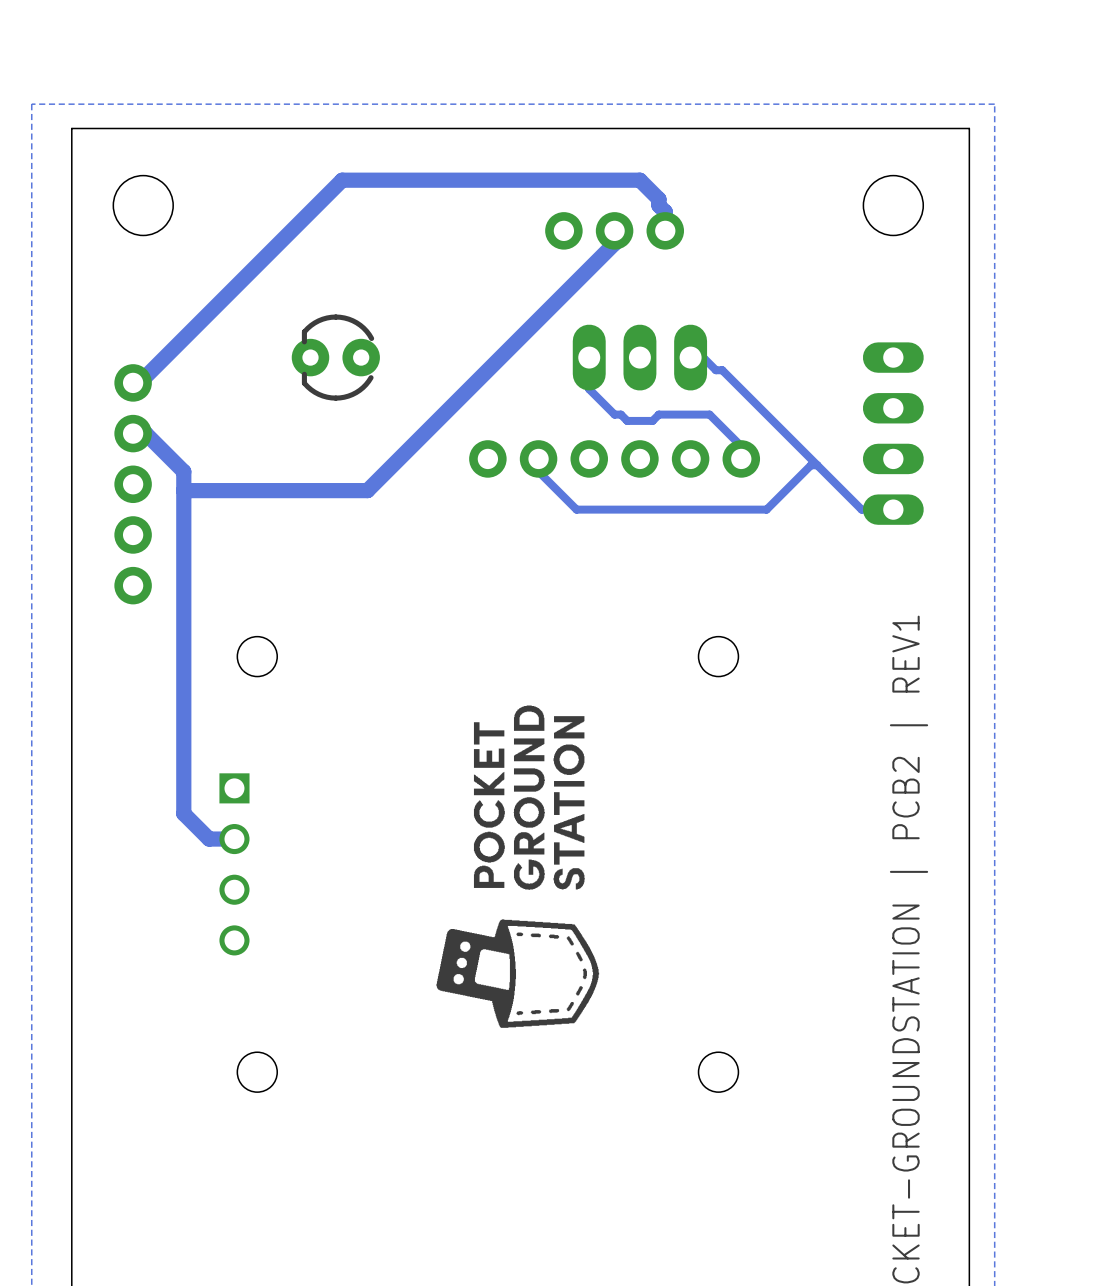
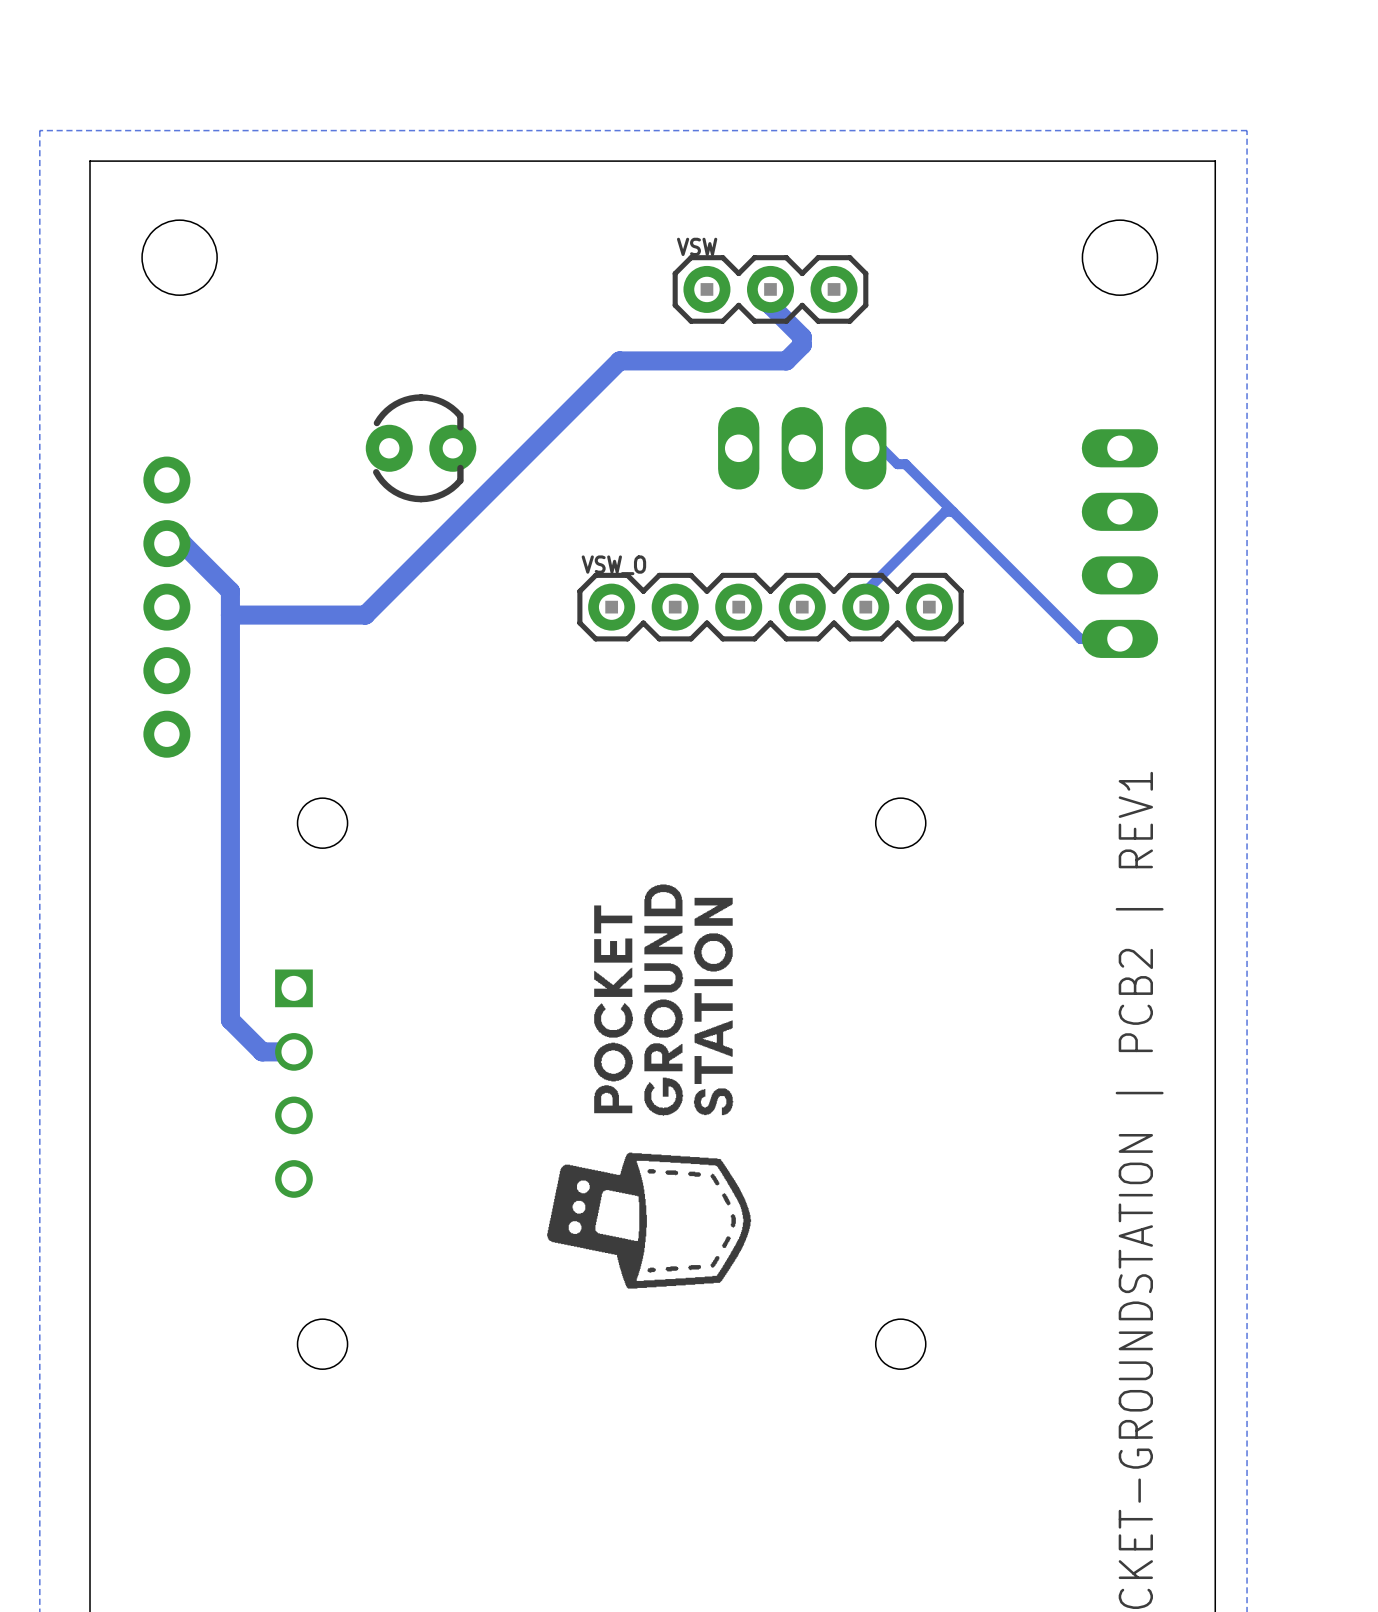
VSW side: top (614, 230) -> bottom (770, 289)
track: (665, 230) (665, 211) (658, 205) (658, 199) (639, 180) (342, 180) (139, 382) (133, 382) -> none
track: (614, 243) (367, 490) (291, 490) -> (770, 305) (802, 337) (802, 345) (786, 360) (619, 360) (365, 615)
part rotation: 0° (335, 357) -> 180° (421, 448)
track: (589, 357) (589, 389) (614, 414) (620, 414) (627, 420) (652, 420) (658, 414) (709, 414) (741, 446) (741, 458) -> none
track: none -> (953, 511) (945, 511) (865, 591) (865, 607)
track: (538, 458) (538, 471) (576, 509) (766, 509) (810, 465) (817, 465) -> none
VSW_O side: top (614, 458) -> bottom (770, 607)

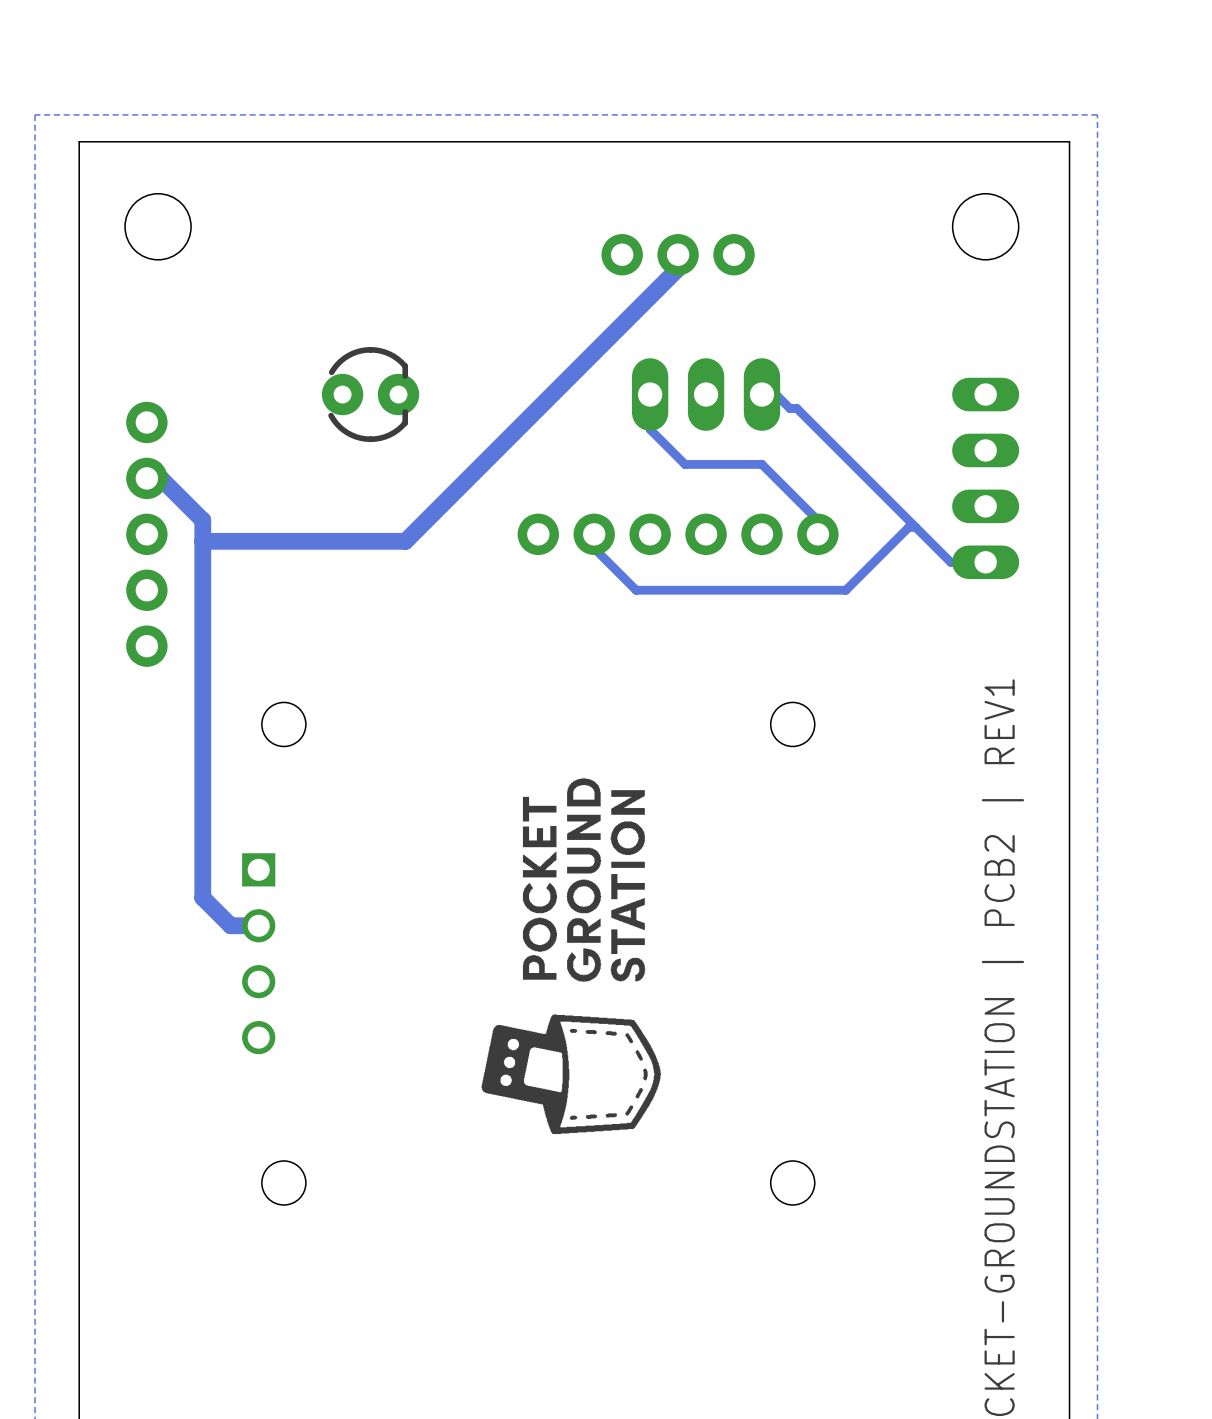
VSW side: bottom (770, 289) -> top (678, 254)
track: (770, 305) (802, 337) (802, 345) (786, 360) (619, 360) (365, 615) -> (678, 268) (405, 541) (321, 541)
track: none -> (650, 394) (650, 429) (685, 464) (761, 464) (817, 520) (817, 534)
track: (953, 511) (945, 511) (865, 591) (865, 607) -> none
track: none -> (915, 527) (908, 527) (845, 590) (636, 590) (594, 548) (594, 534)
VSW_O side: bottom (770, 607) -> top (678, 534)

